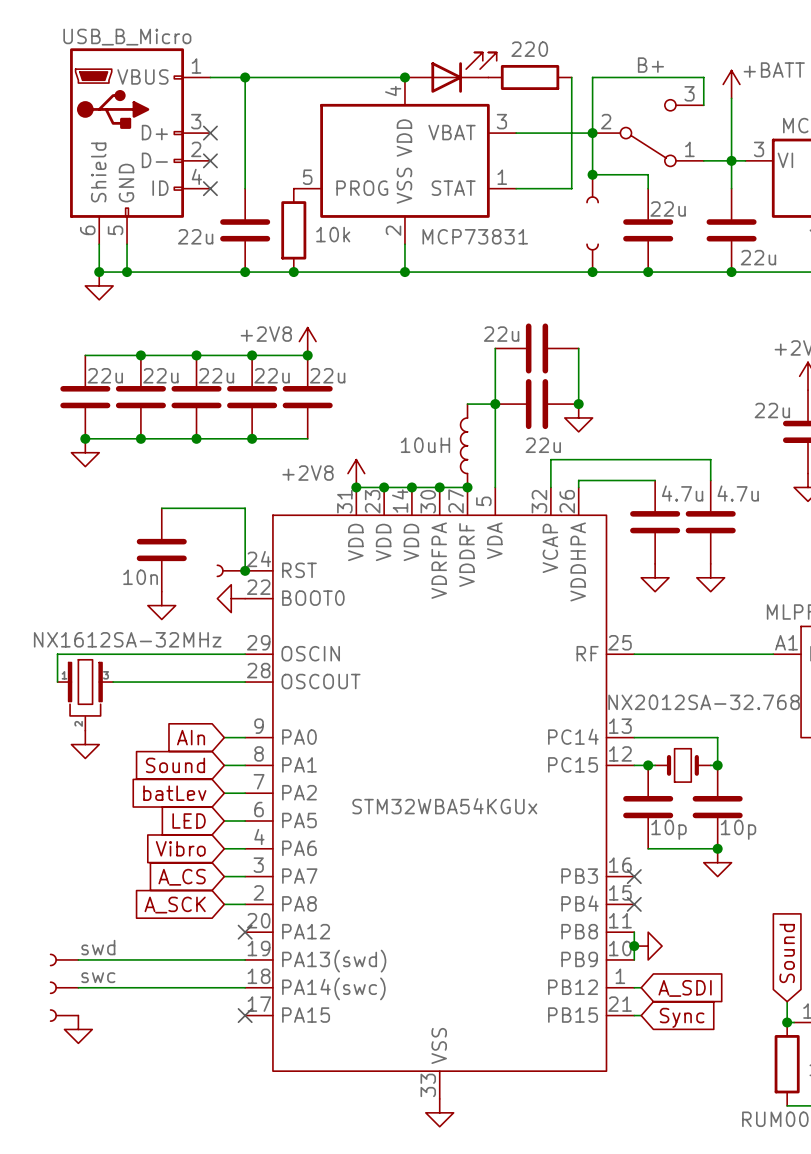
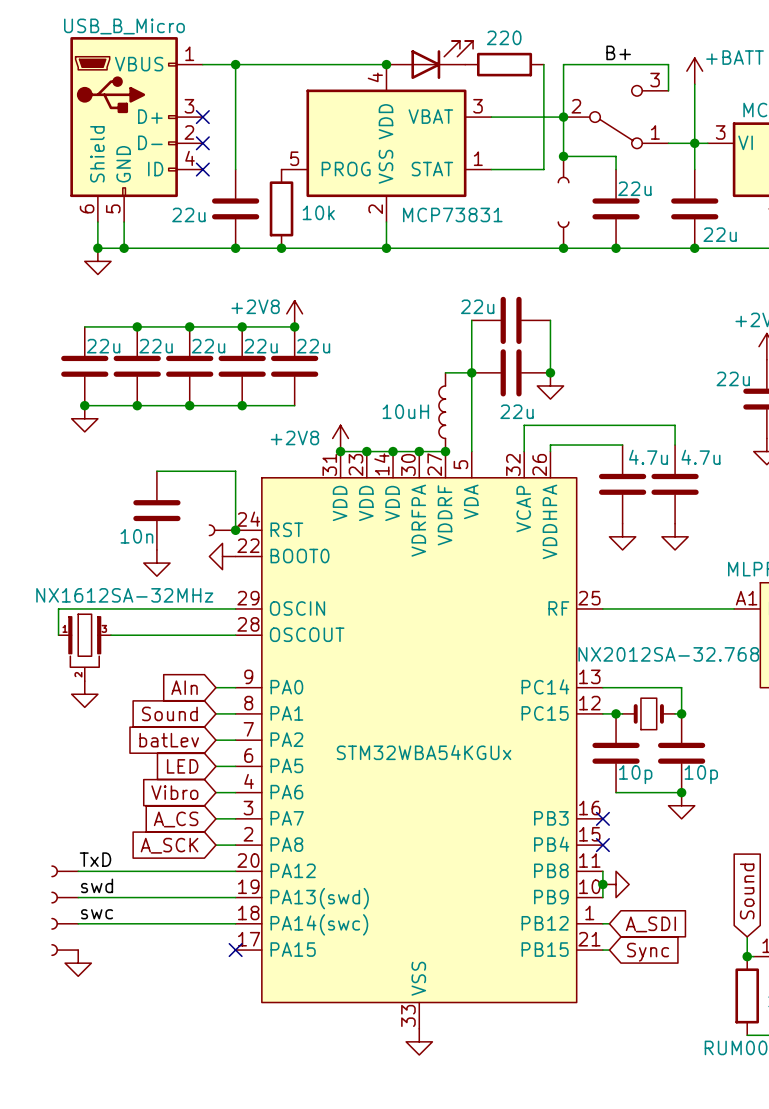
label: none -> TxD (95, 859)
part: none -> (64, 871)
wire: none -> (78, 871) (235, 871)
no-connect mark: (245, 932) -> none

